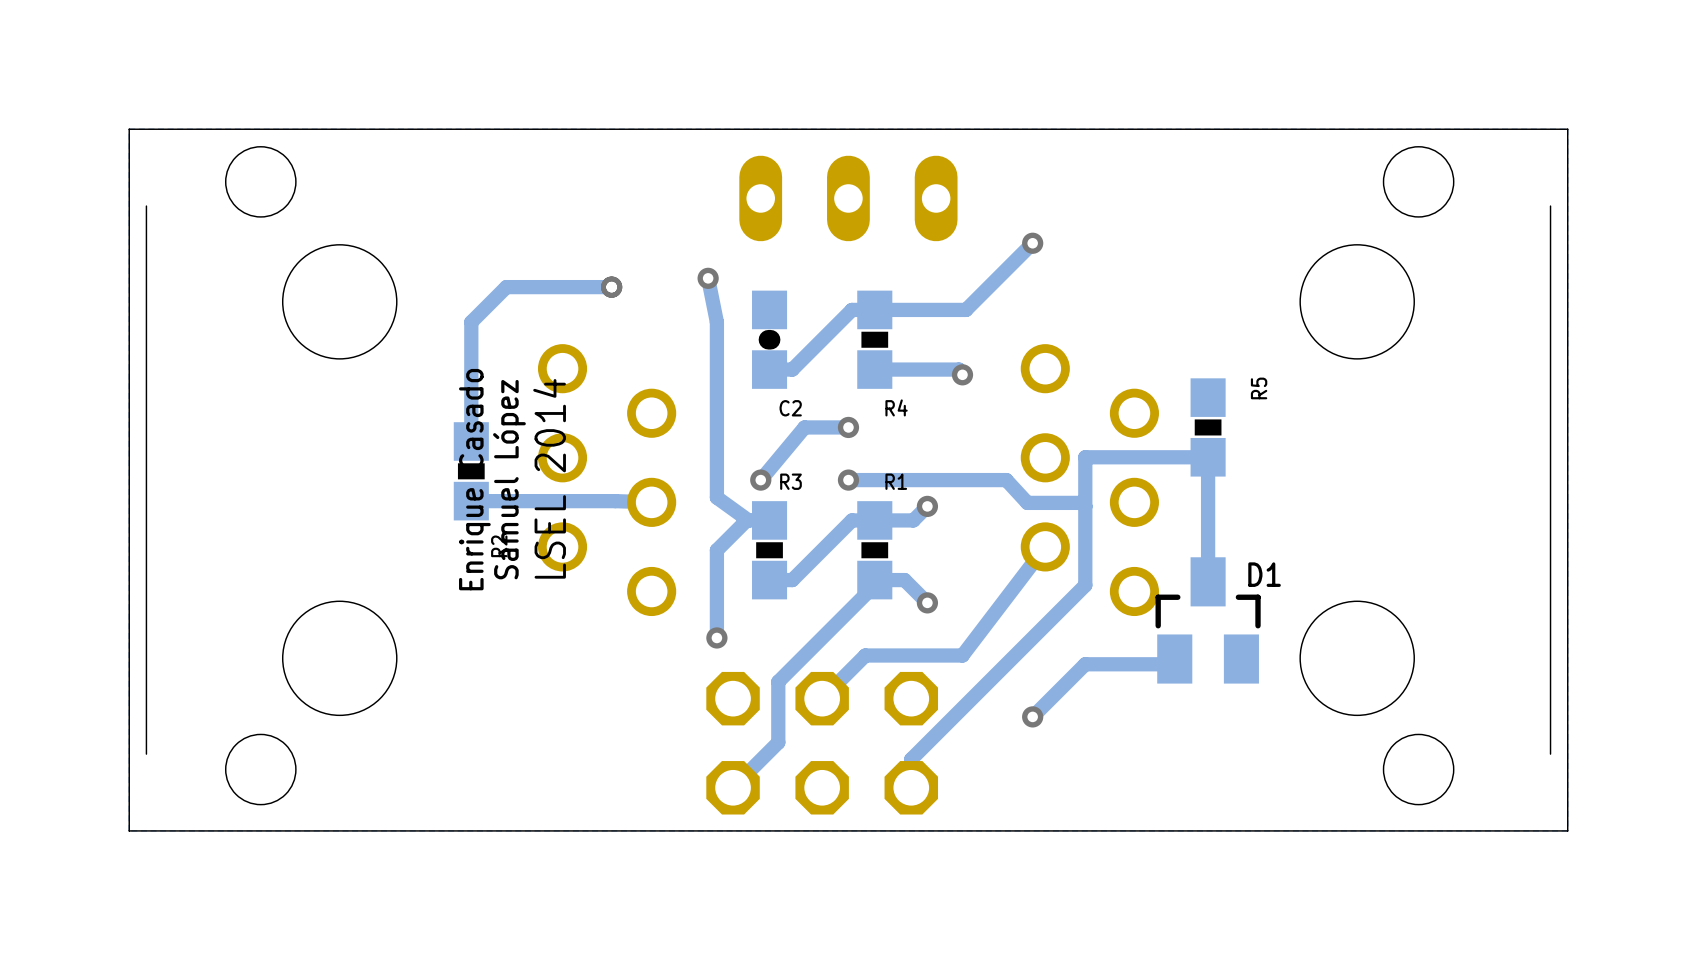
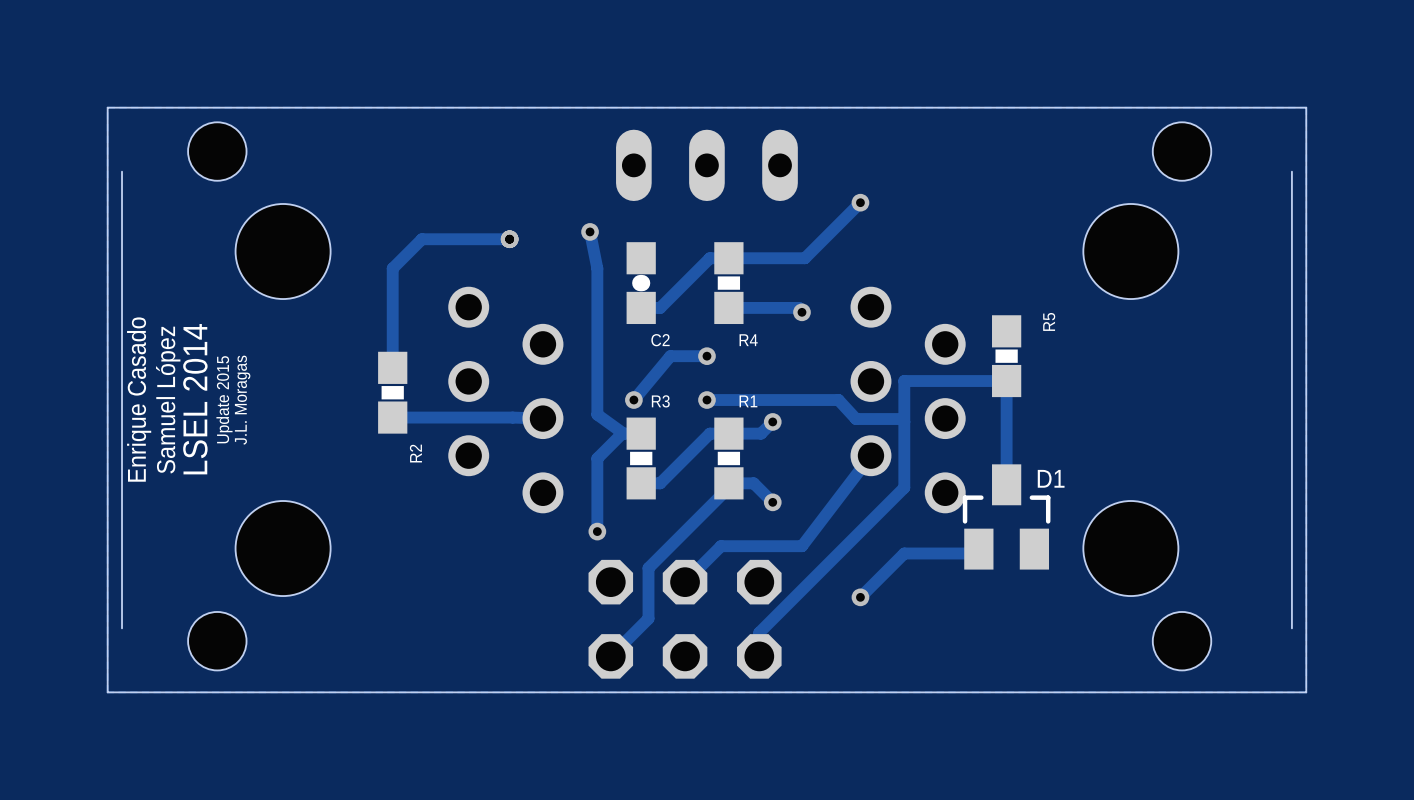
text position: LSEL 2014 (549, 478) -> LSEL 2014 (195, 399)
text: none -> Update 2015 (224, 399)
text position: Enrique Casado (474, 479) -> Enrique Casado (139, 399)
text position: Samuel López (509, 479) -> Samuel López (168, 400)
text: none -> J.L. Moragas (242, 400)

